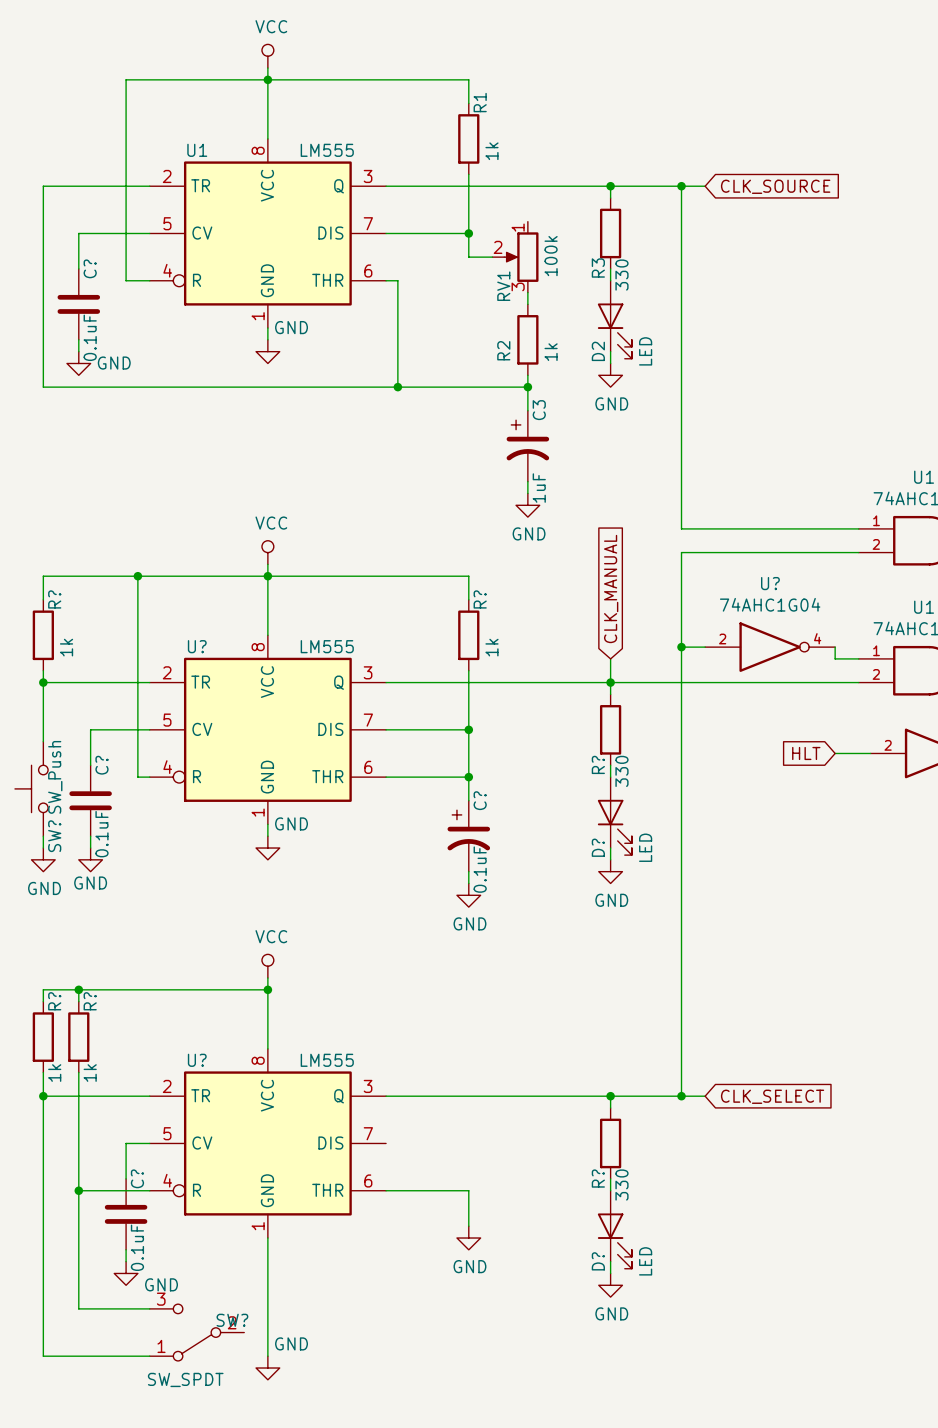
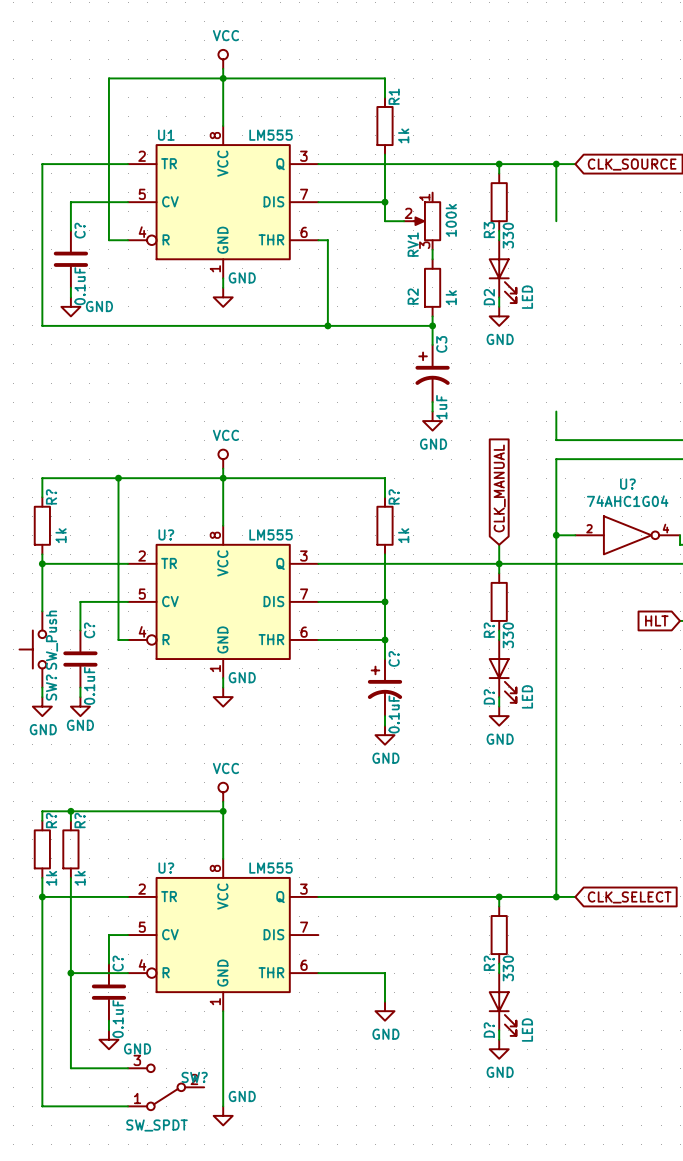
wire: (681, 257) (681, 493) -> none

